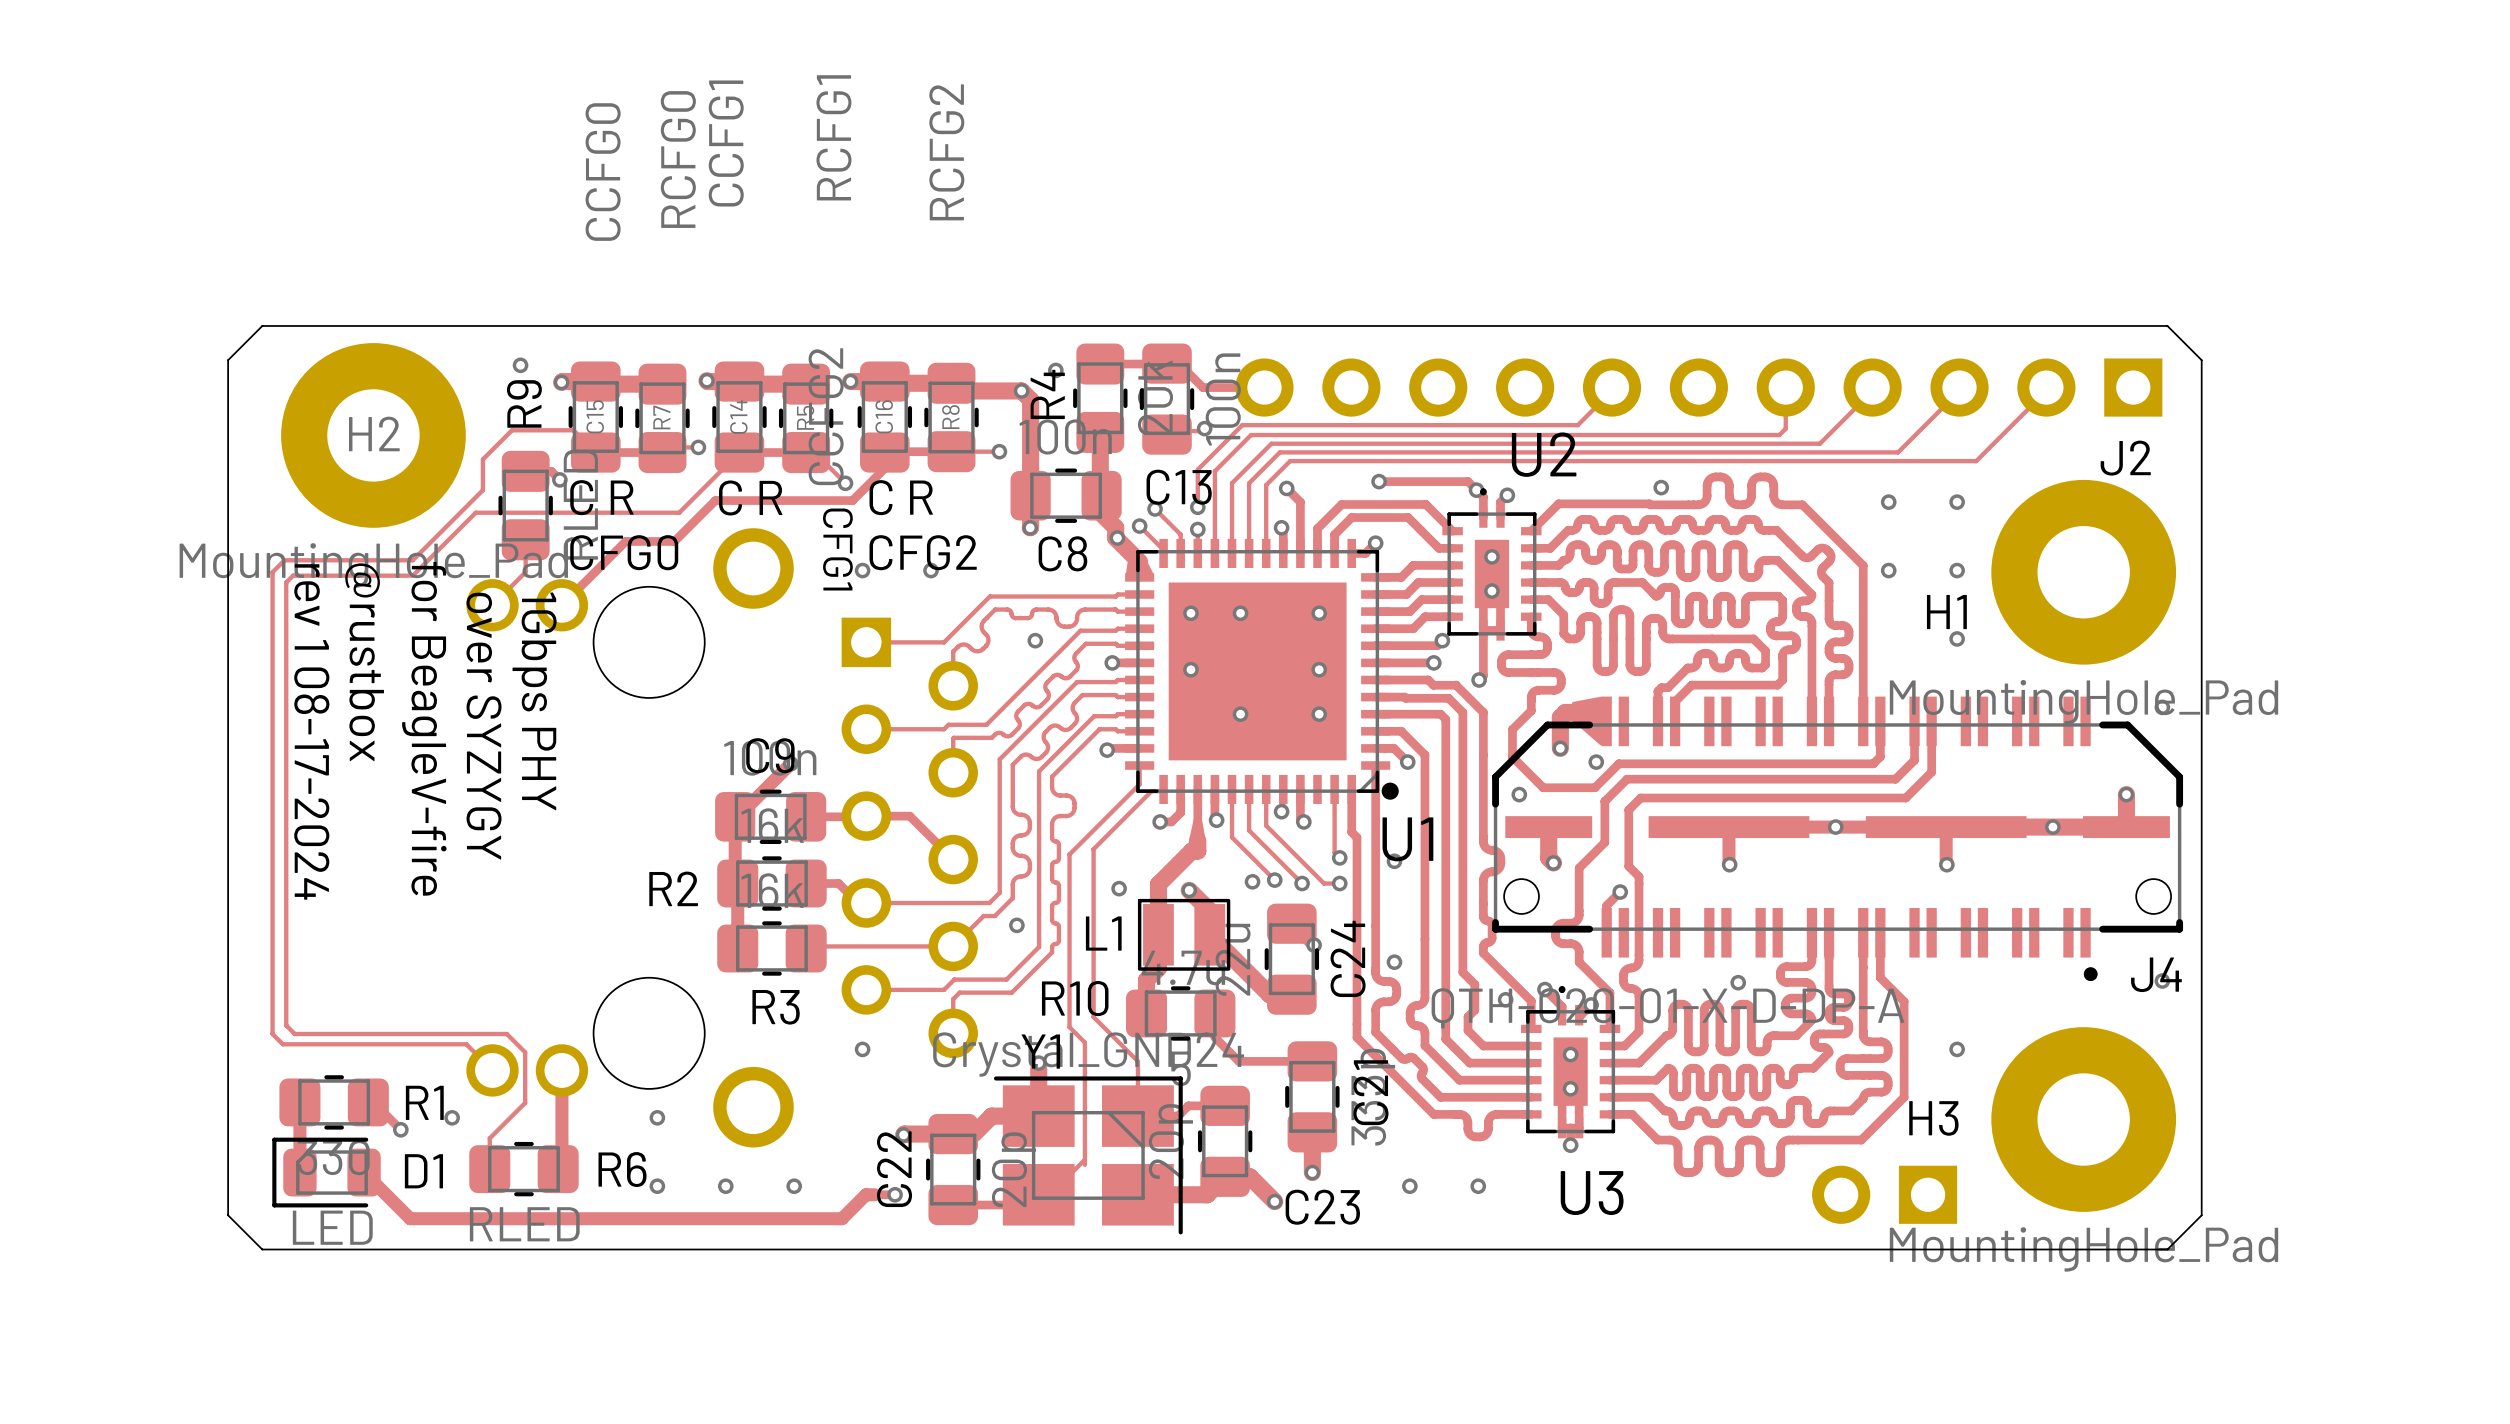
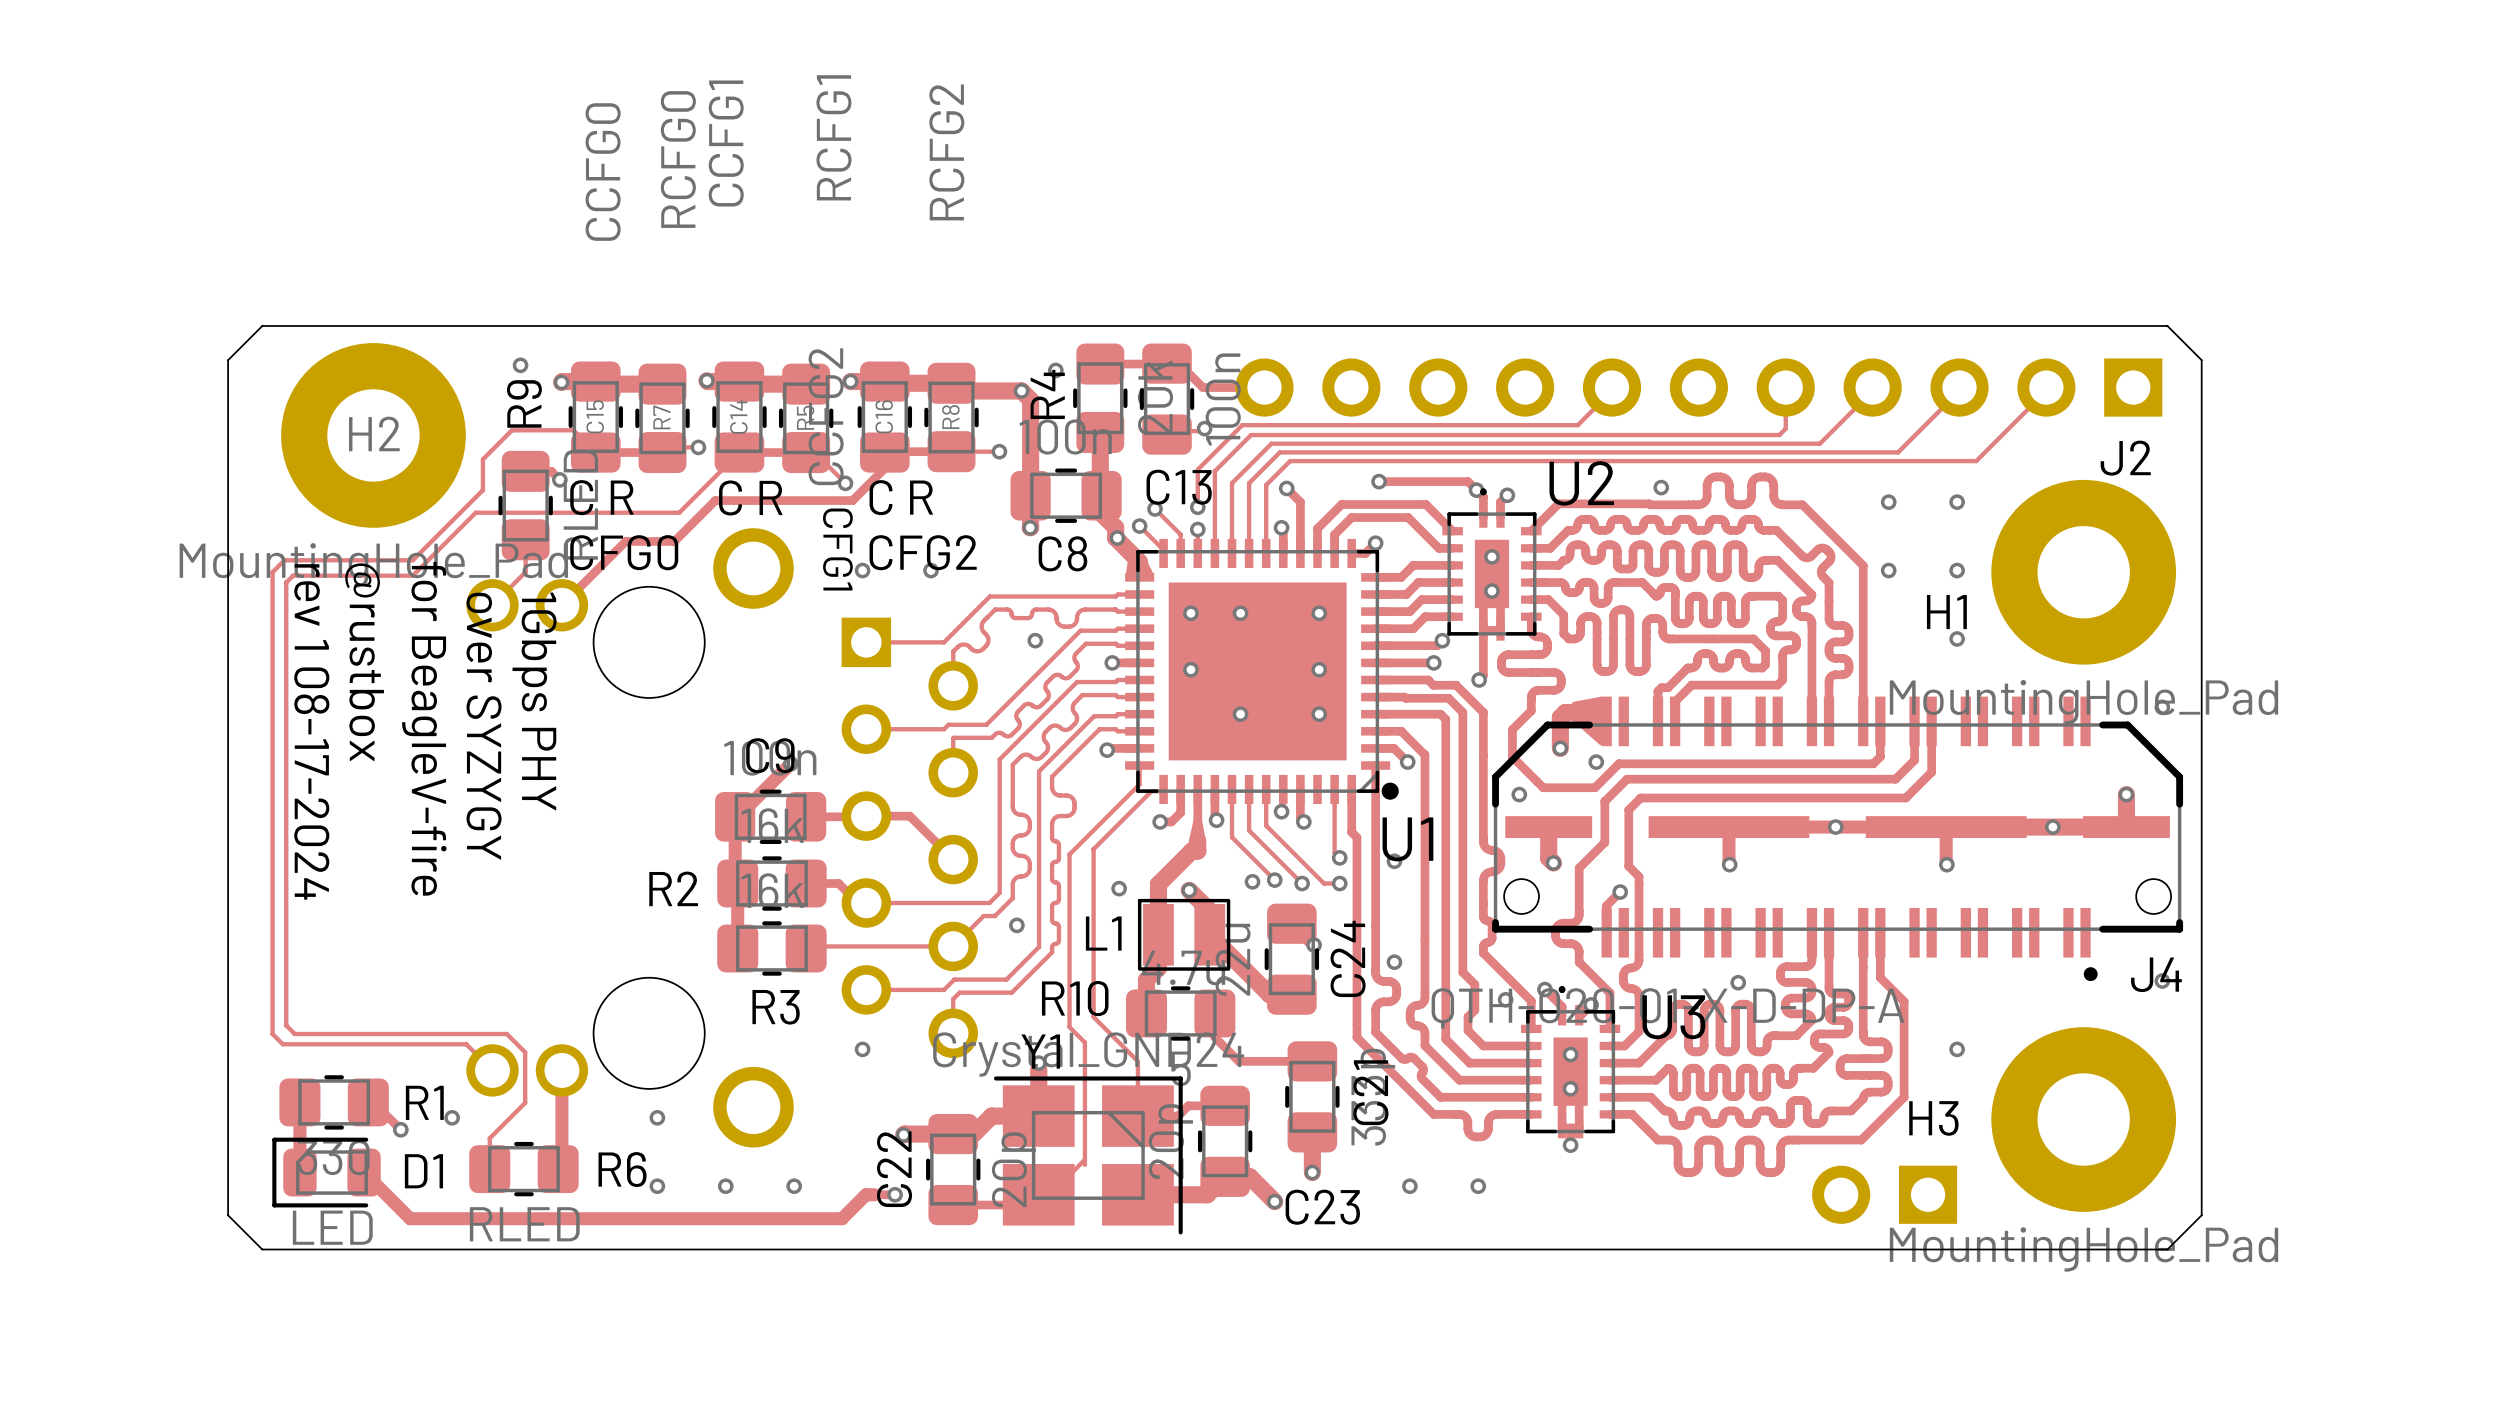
U2 name position: U2 (1544, 454) -> U2 (1581, 483)
U3 name position: U3 (1592, 1193) -> U3 (1673, 1017)

